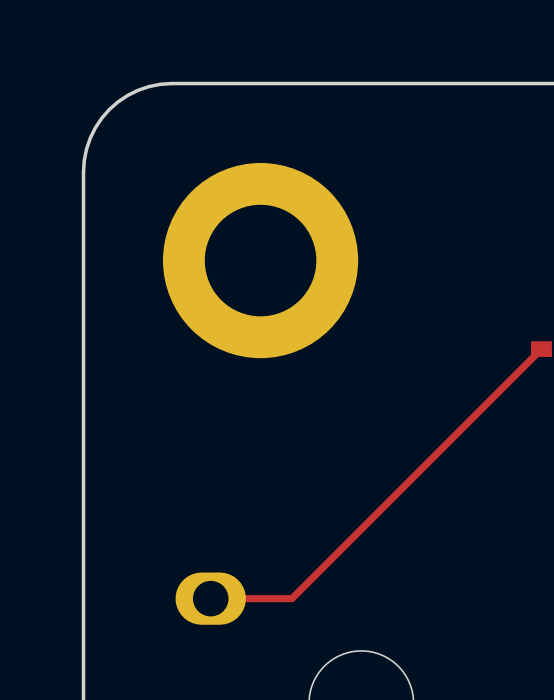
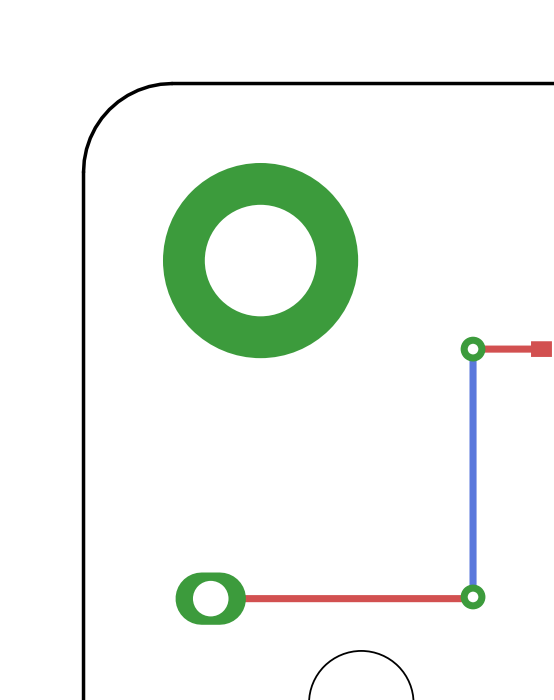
bottom track: none -> (473, 349) (473, 596)
via: none -> (473, 349)
top track: (541, 349) (291, 598) -> (473, 596) (471, 598) (291, 598)
top track: none -> (541, 349) (473, 349)
via: none -> (473, 596)

